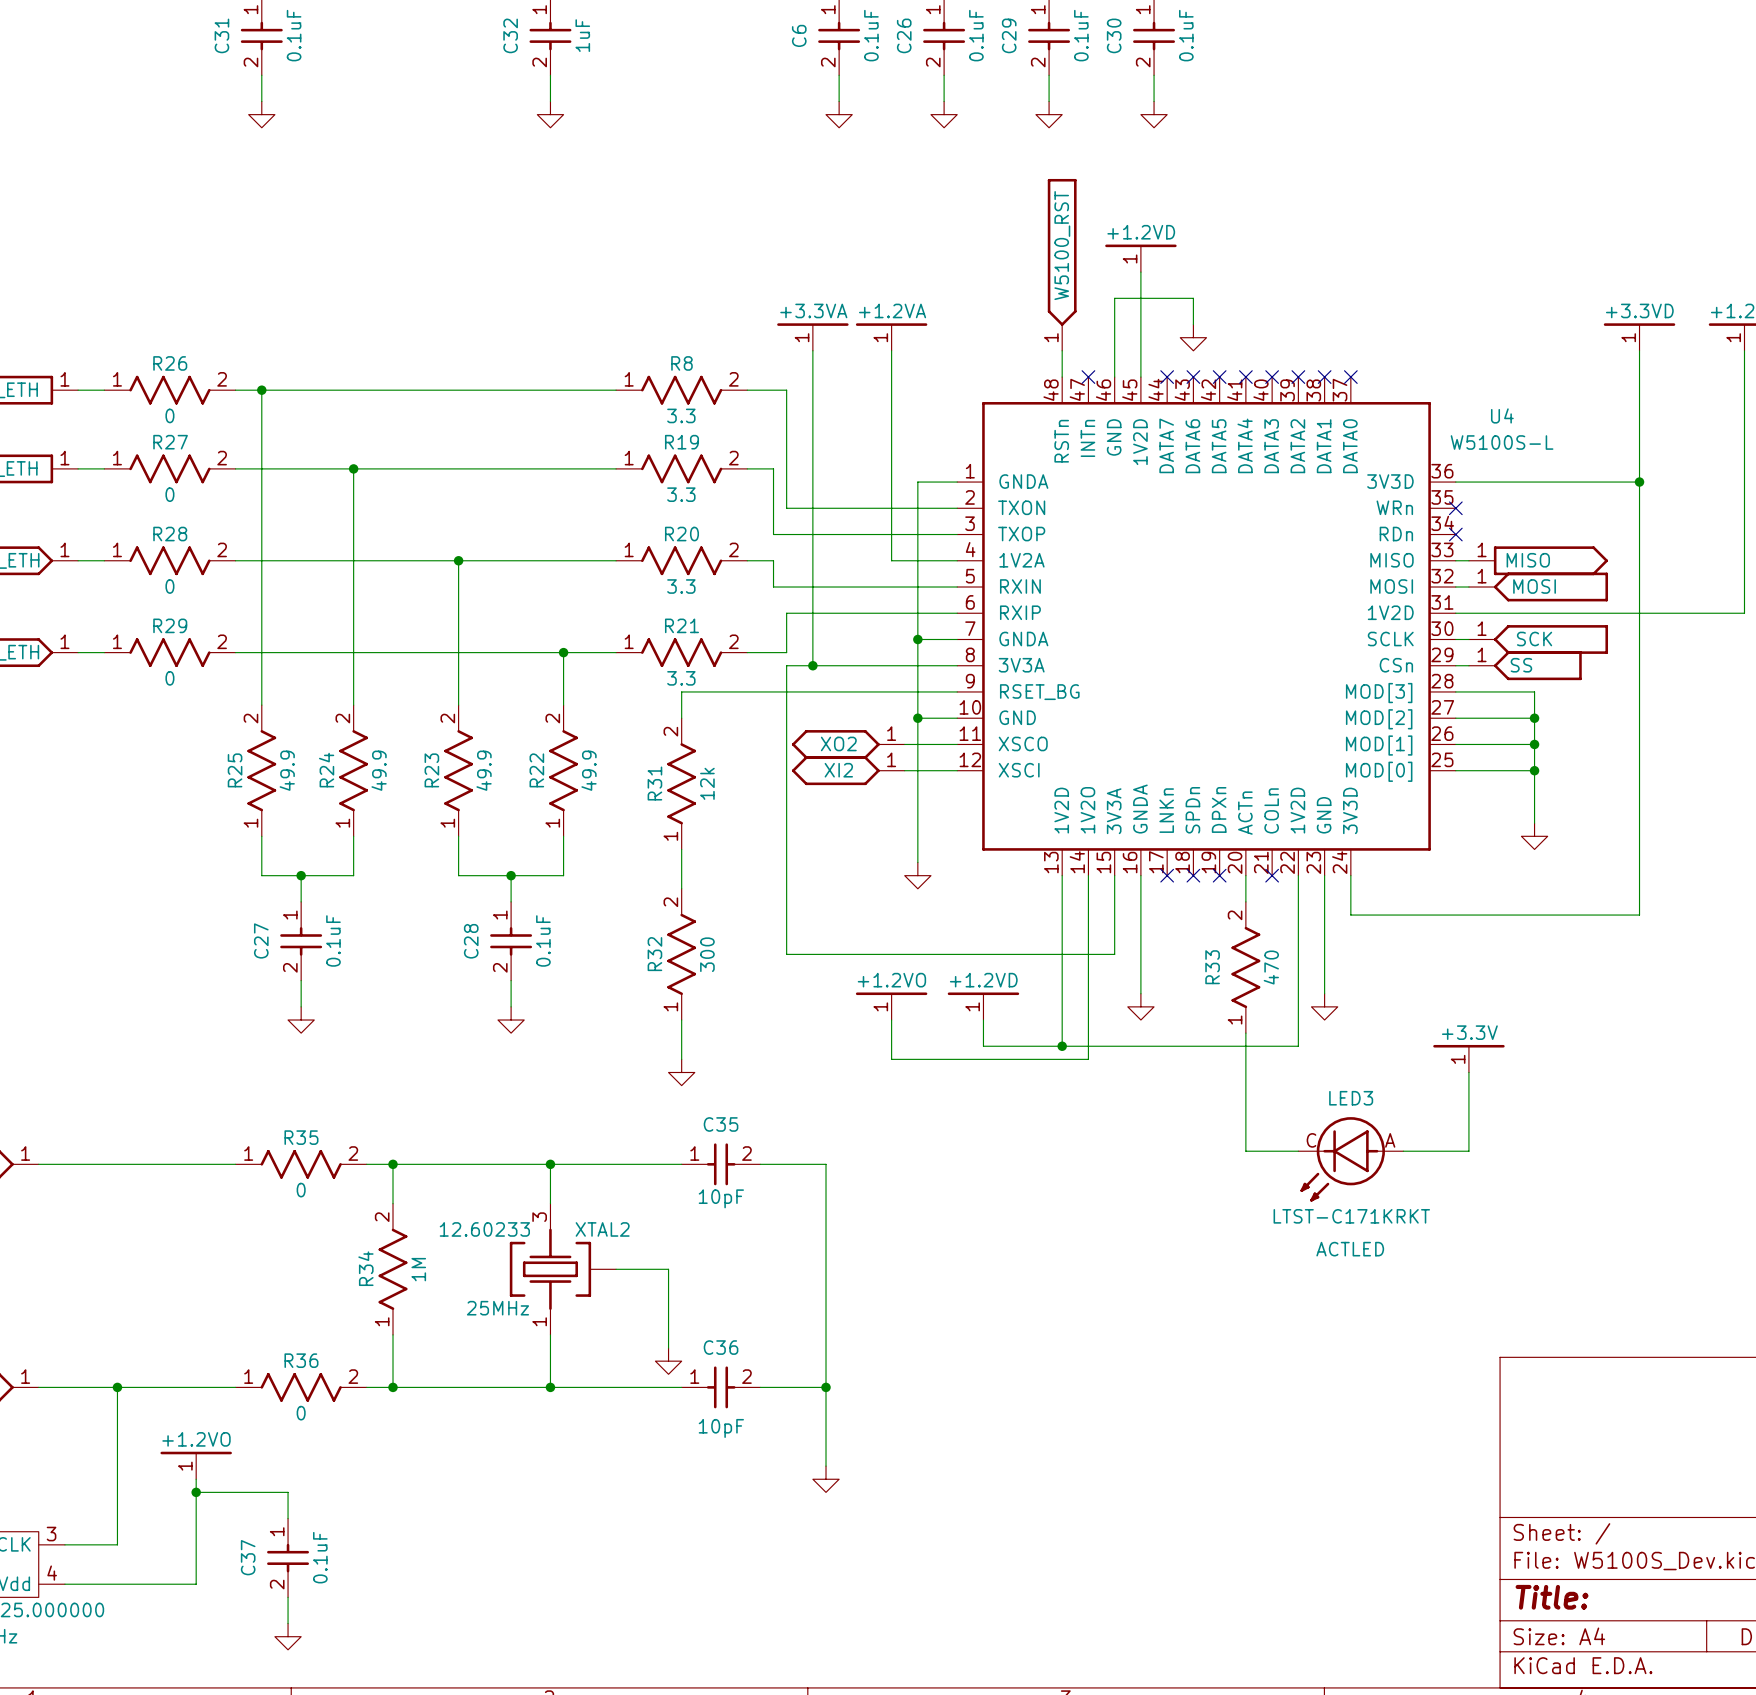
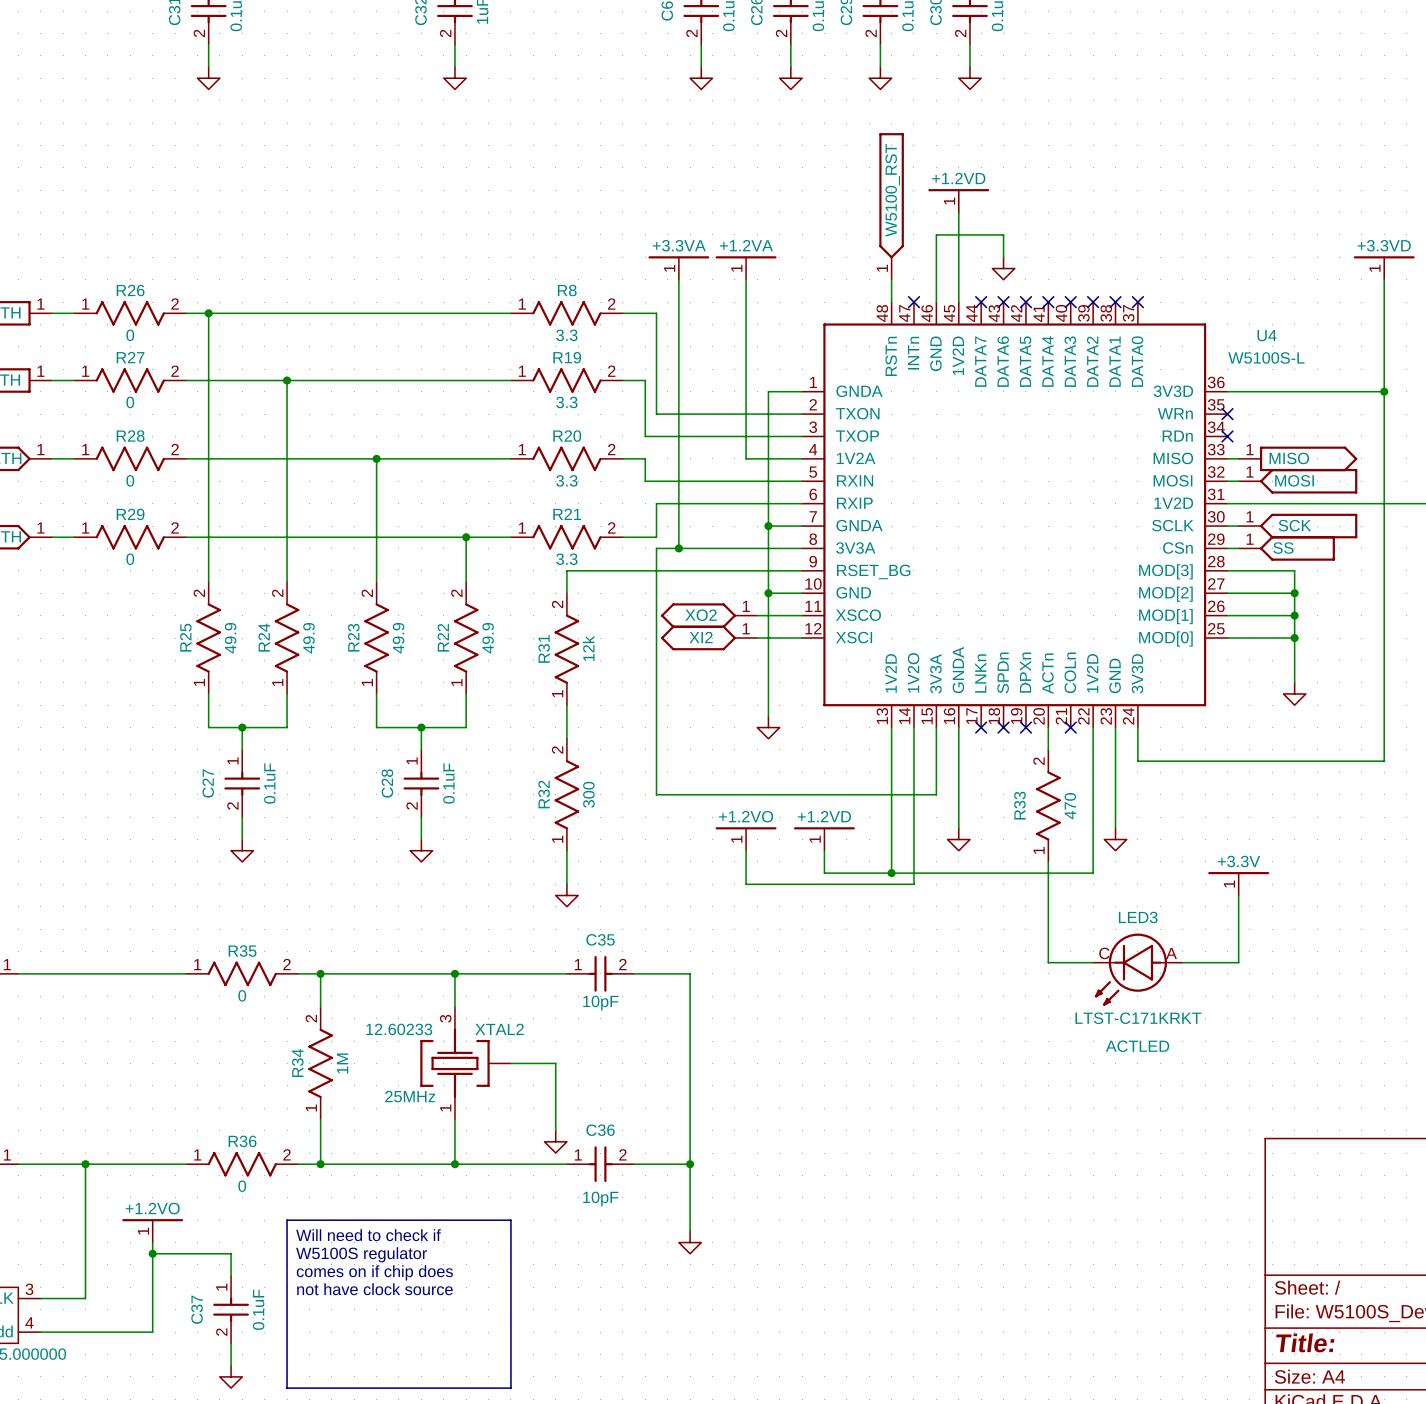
line: none -> (287, 1220) (510, 1220) (510, 1388) (287, 1388) (287, 1220)
text: none -> Will need to check if (368, 1235)
text: none -> W5100S regulator (361, 1254)
text: none -> comes on if chip does (374, 1272)
text: none -> not have clock source (374, 1289)

